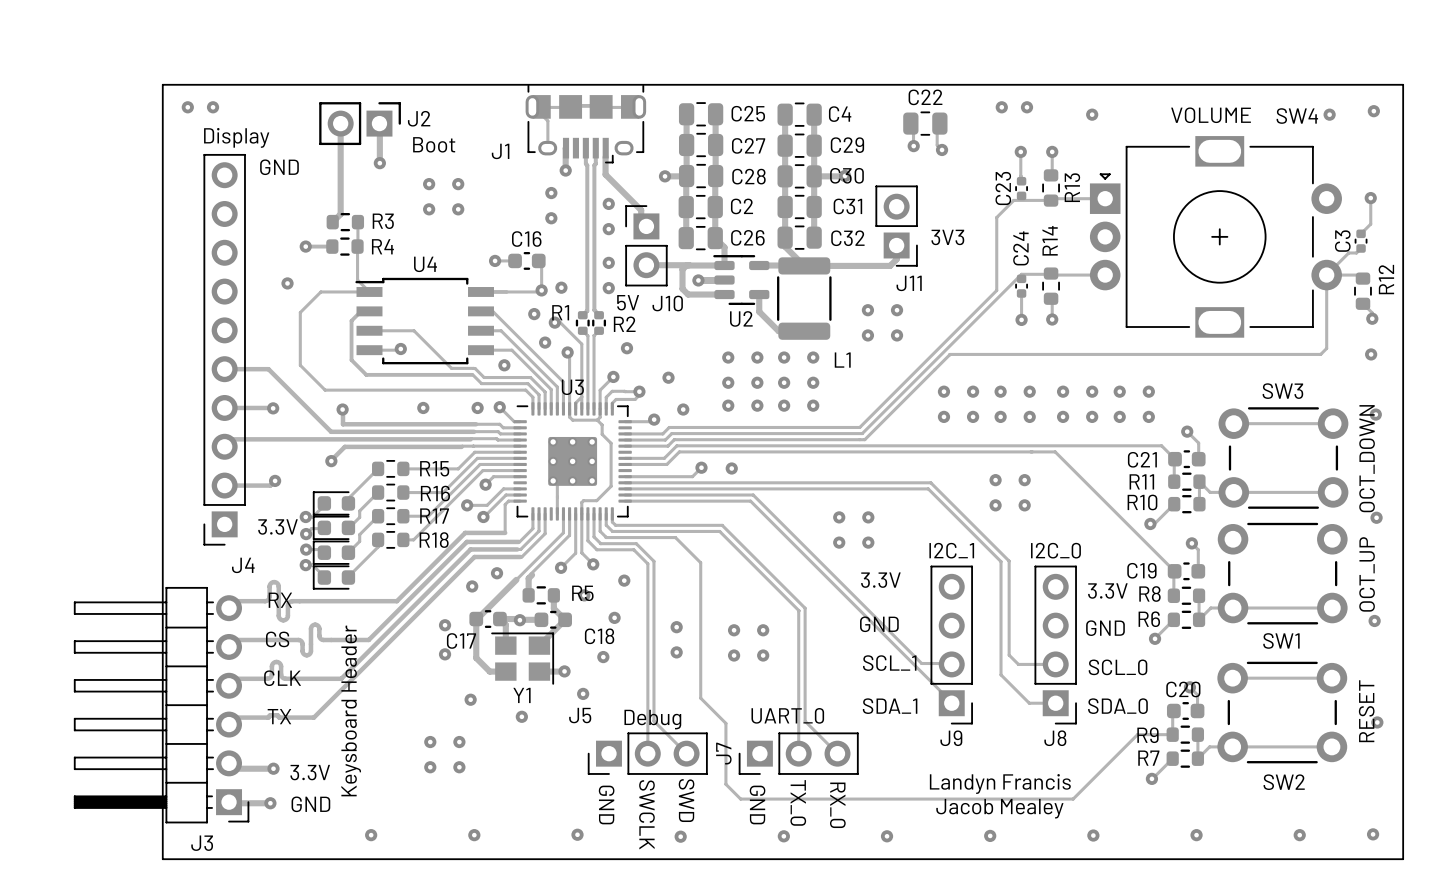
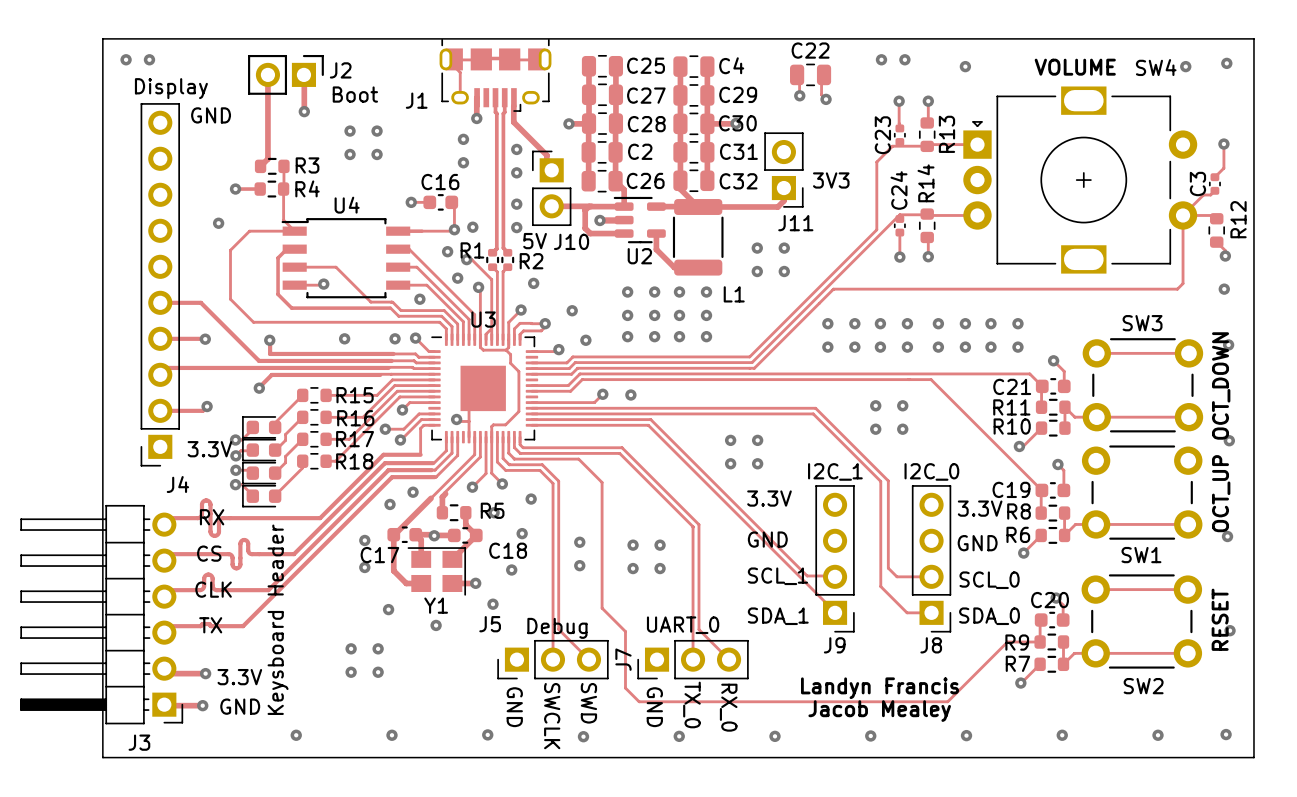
U3 footprint: [513, 402, 632, 521] -> [428, 333, 539, 444]
track: none -> (456, 419) (458, 421) (469, 421)
via: none -> (456, 419)

